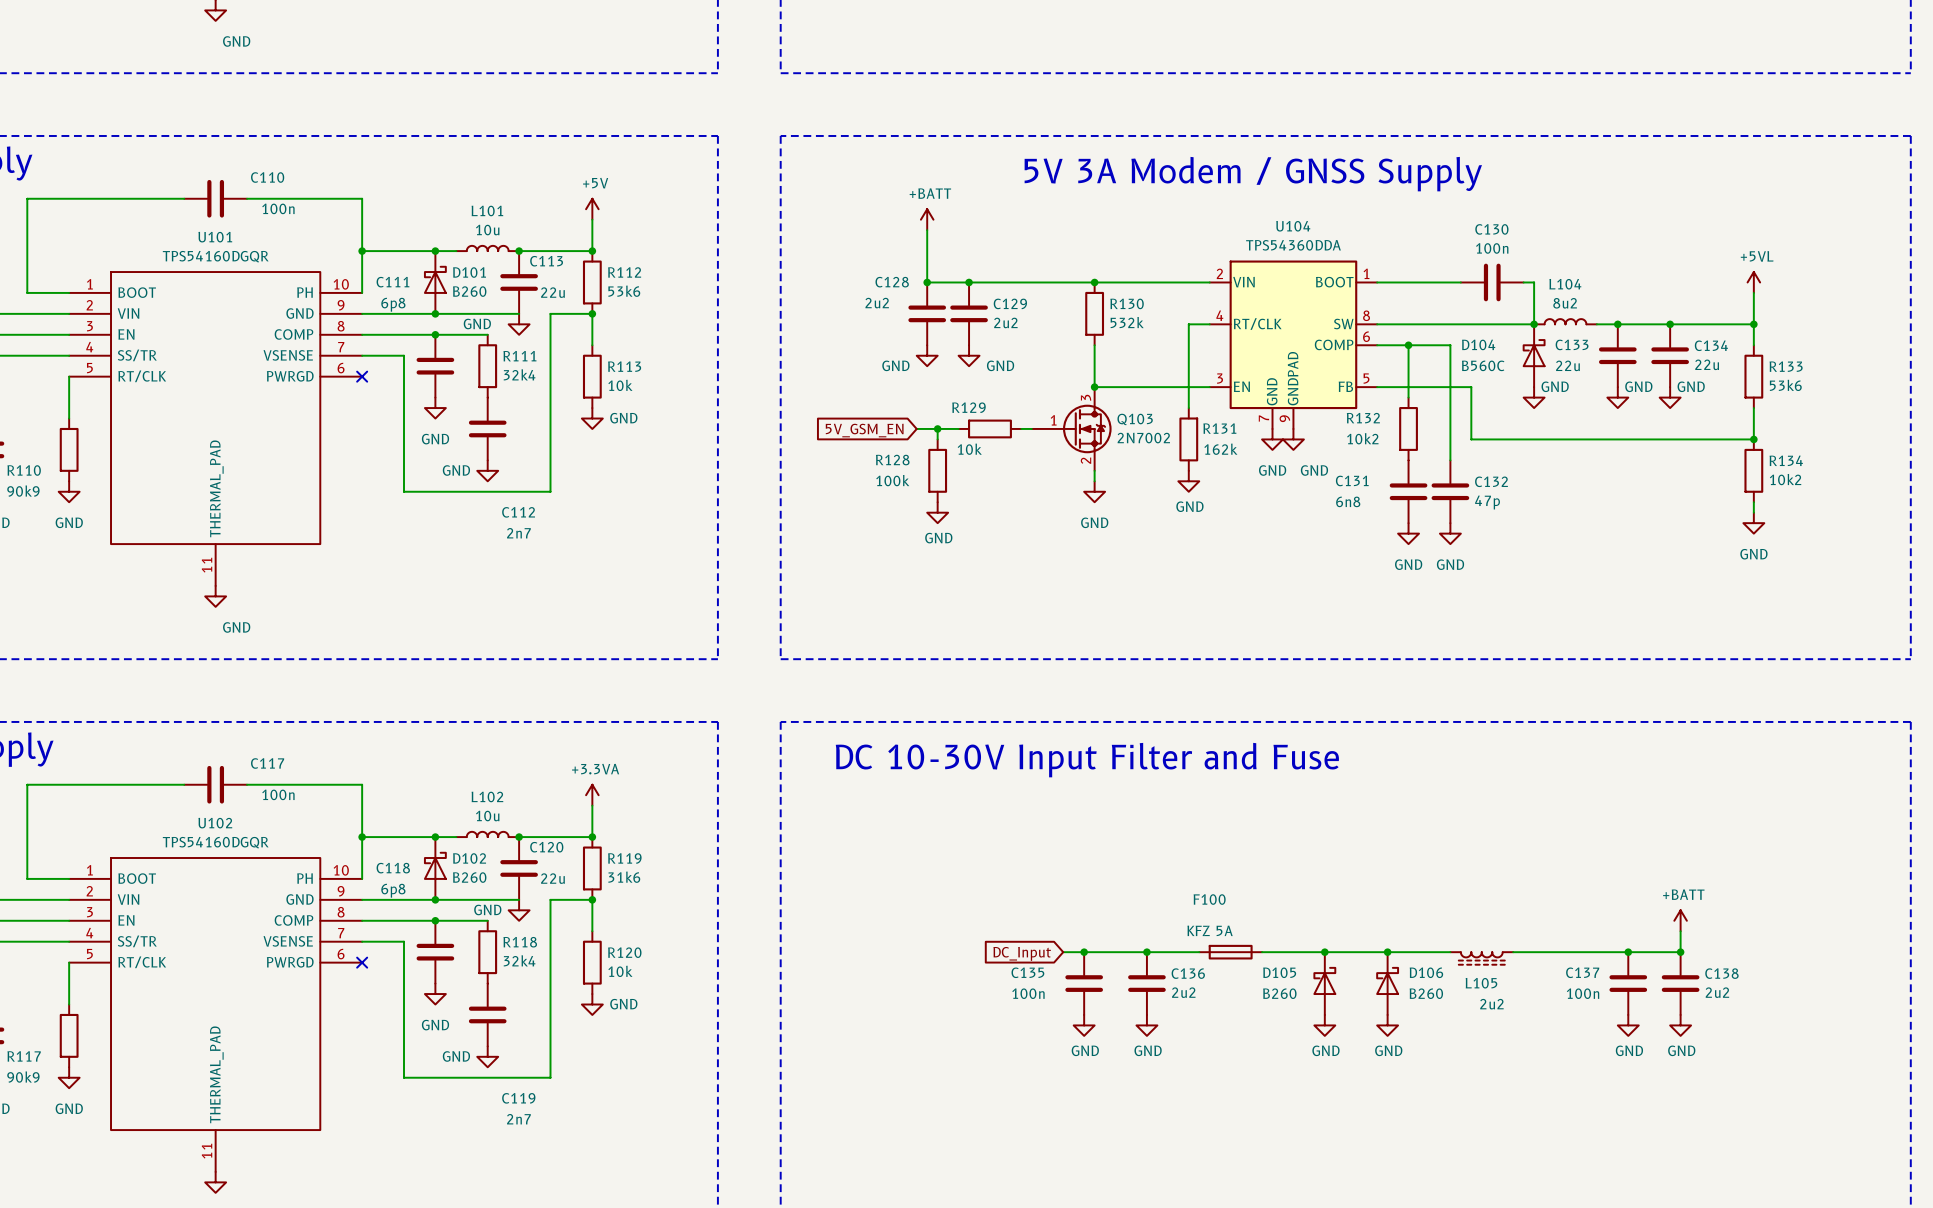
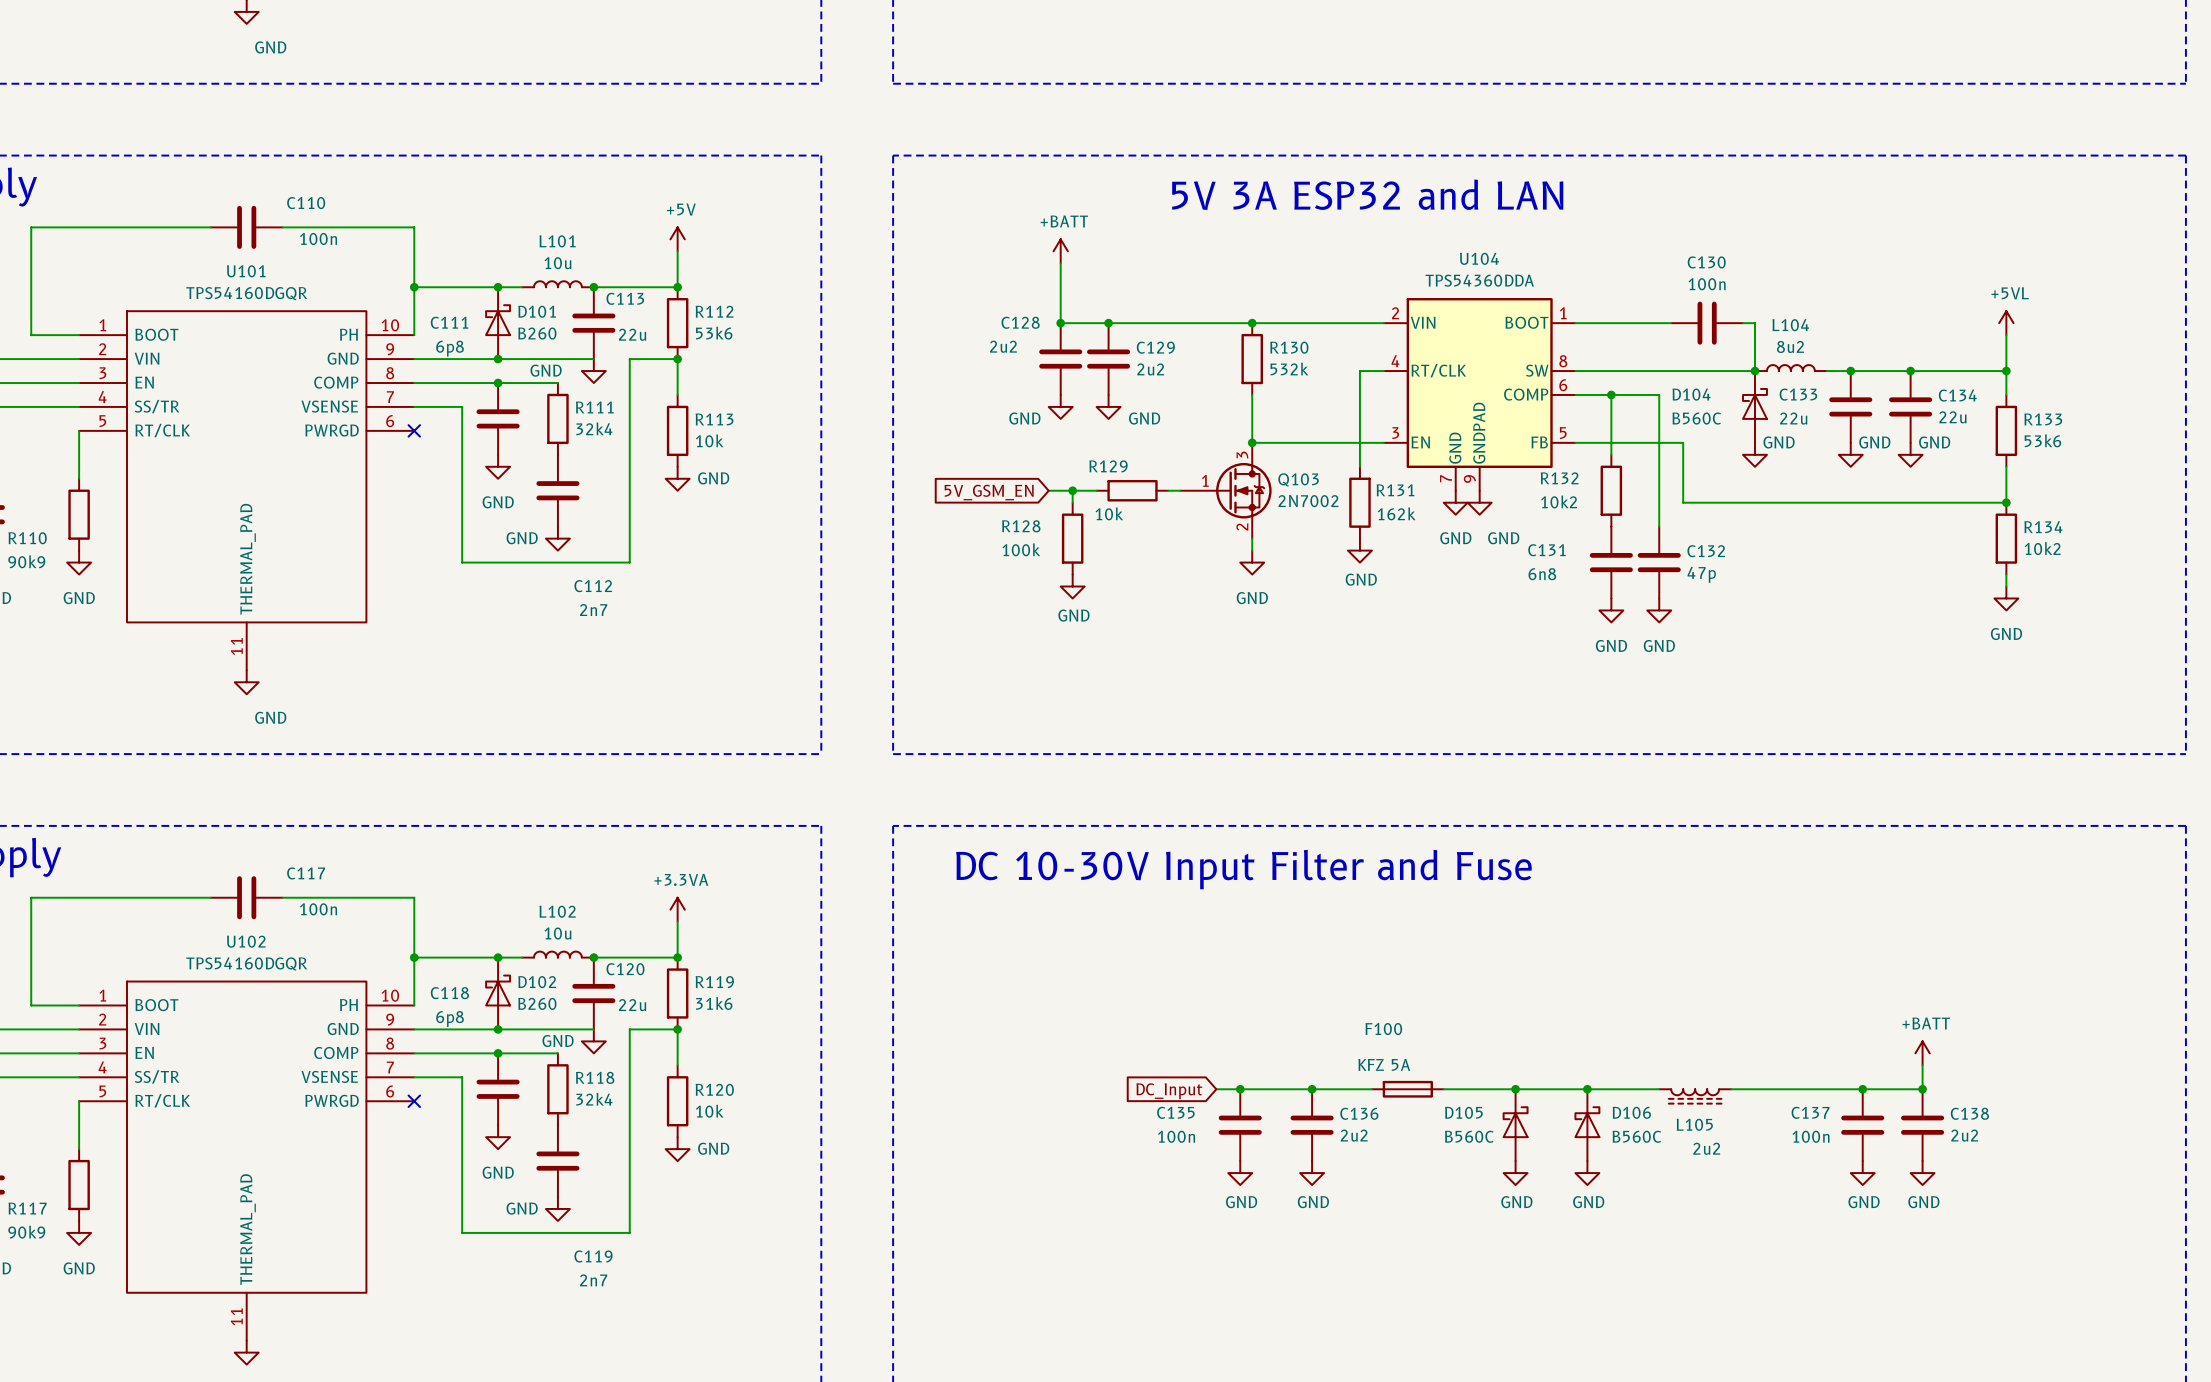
text: 5V 3A Modem / GNSS Supply (1253, 174) -> 5V 3A ESP32 and LAN (1367, 194)
D105 value: B260 (1279, 993) -> B560C (1469, 1136)
D106 value: B260 (1426, 993) -> B560C (1636, 1136)

